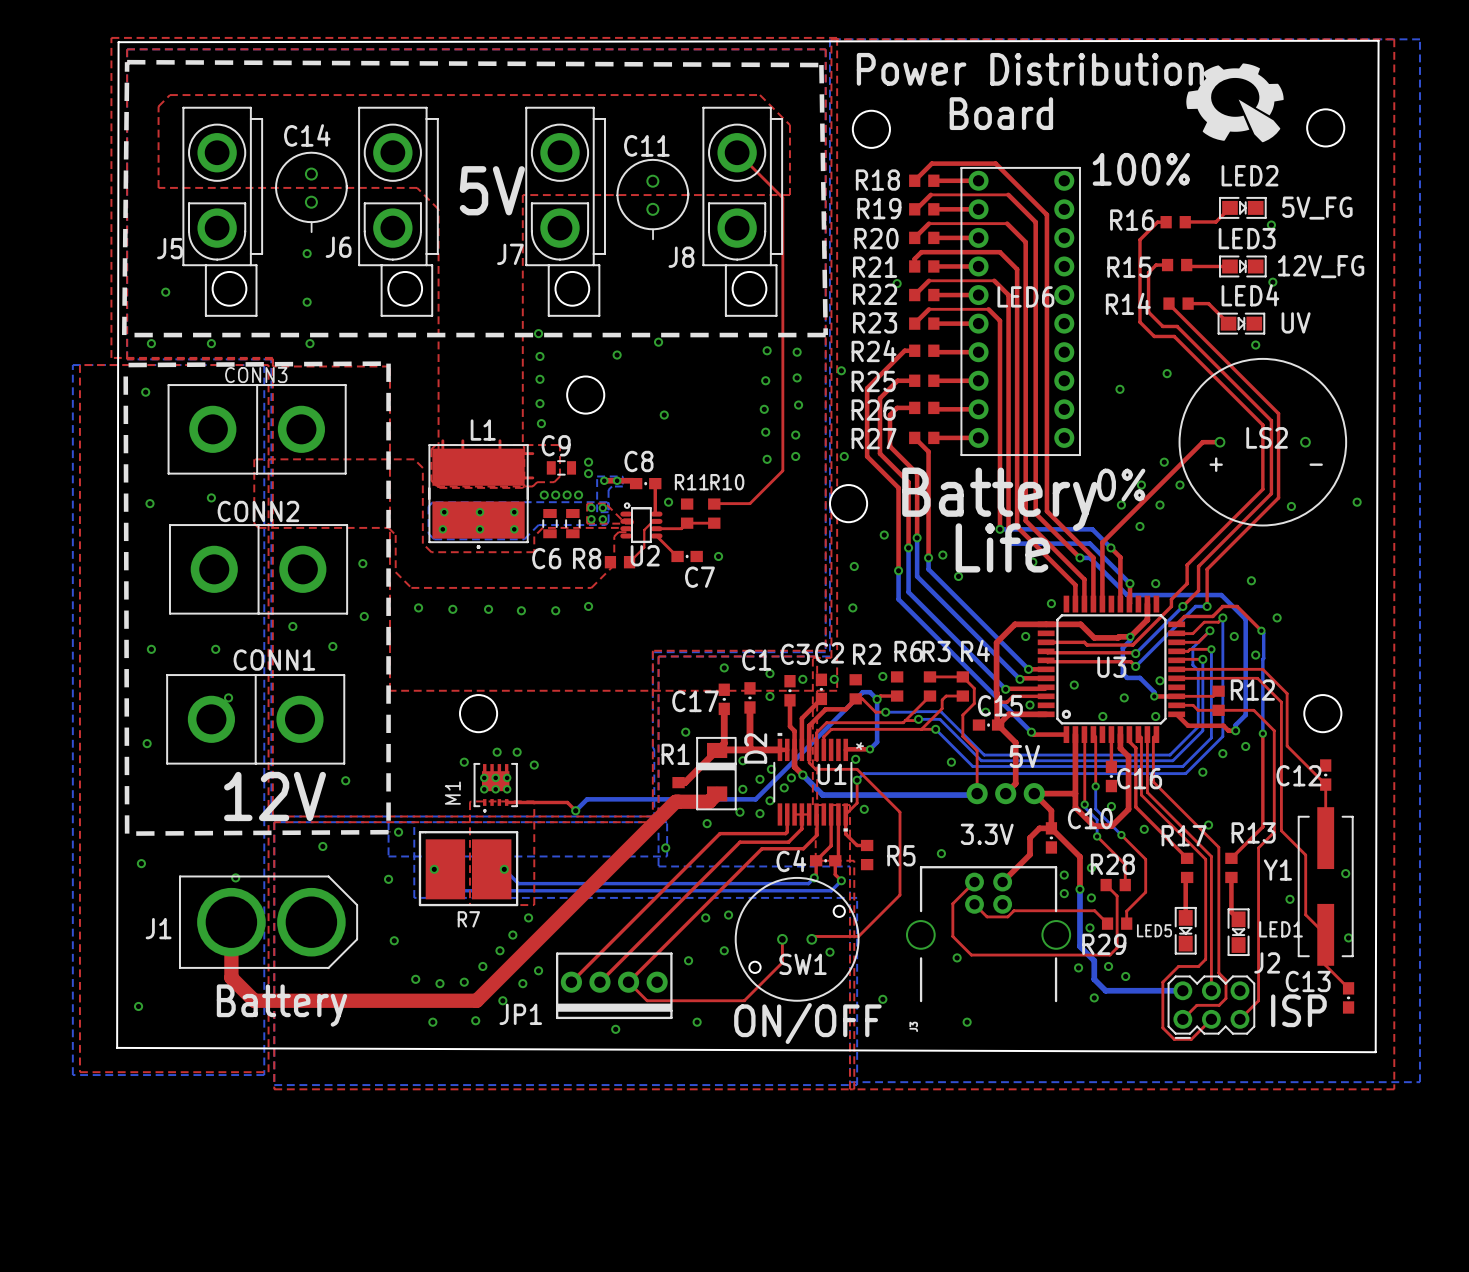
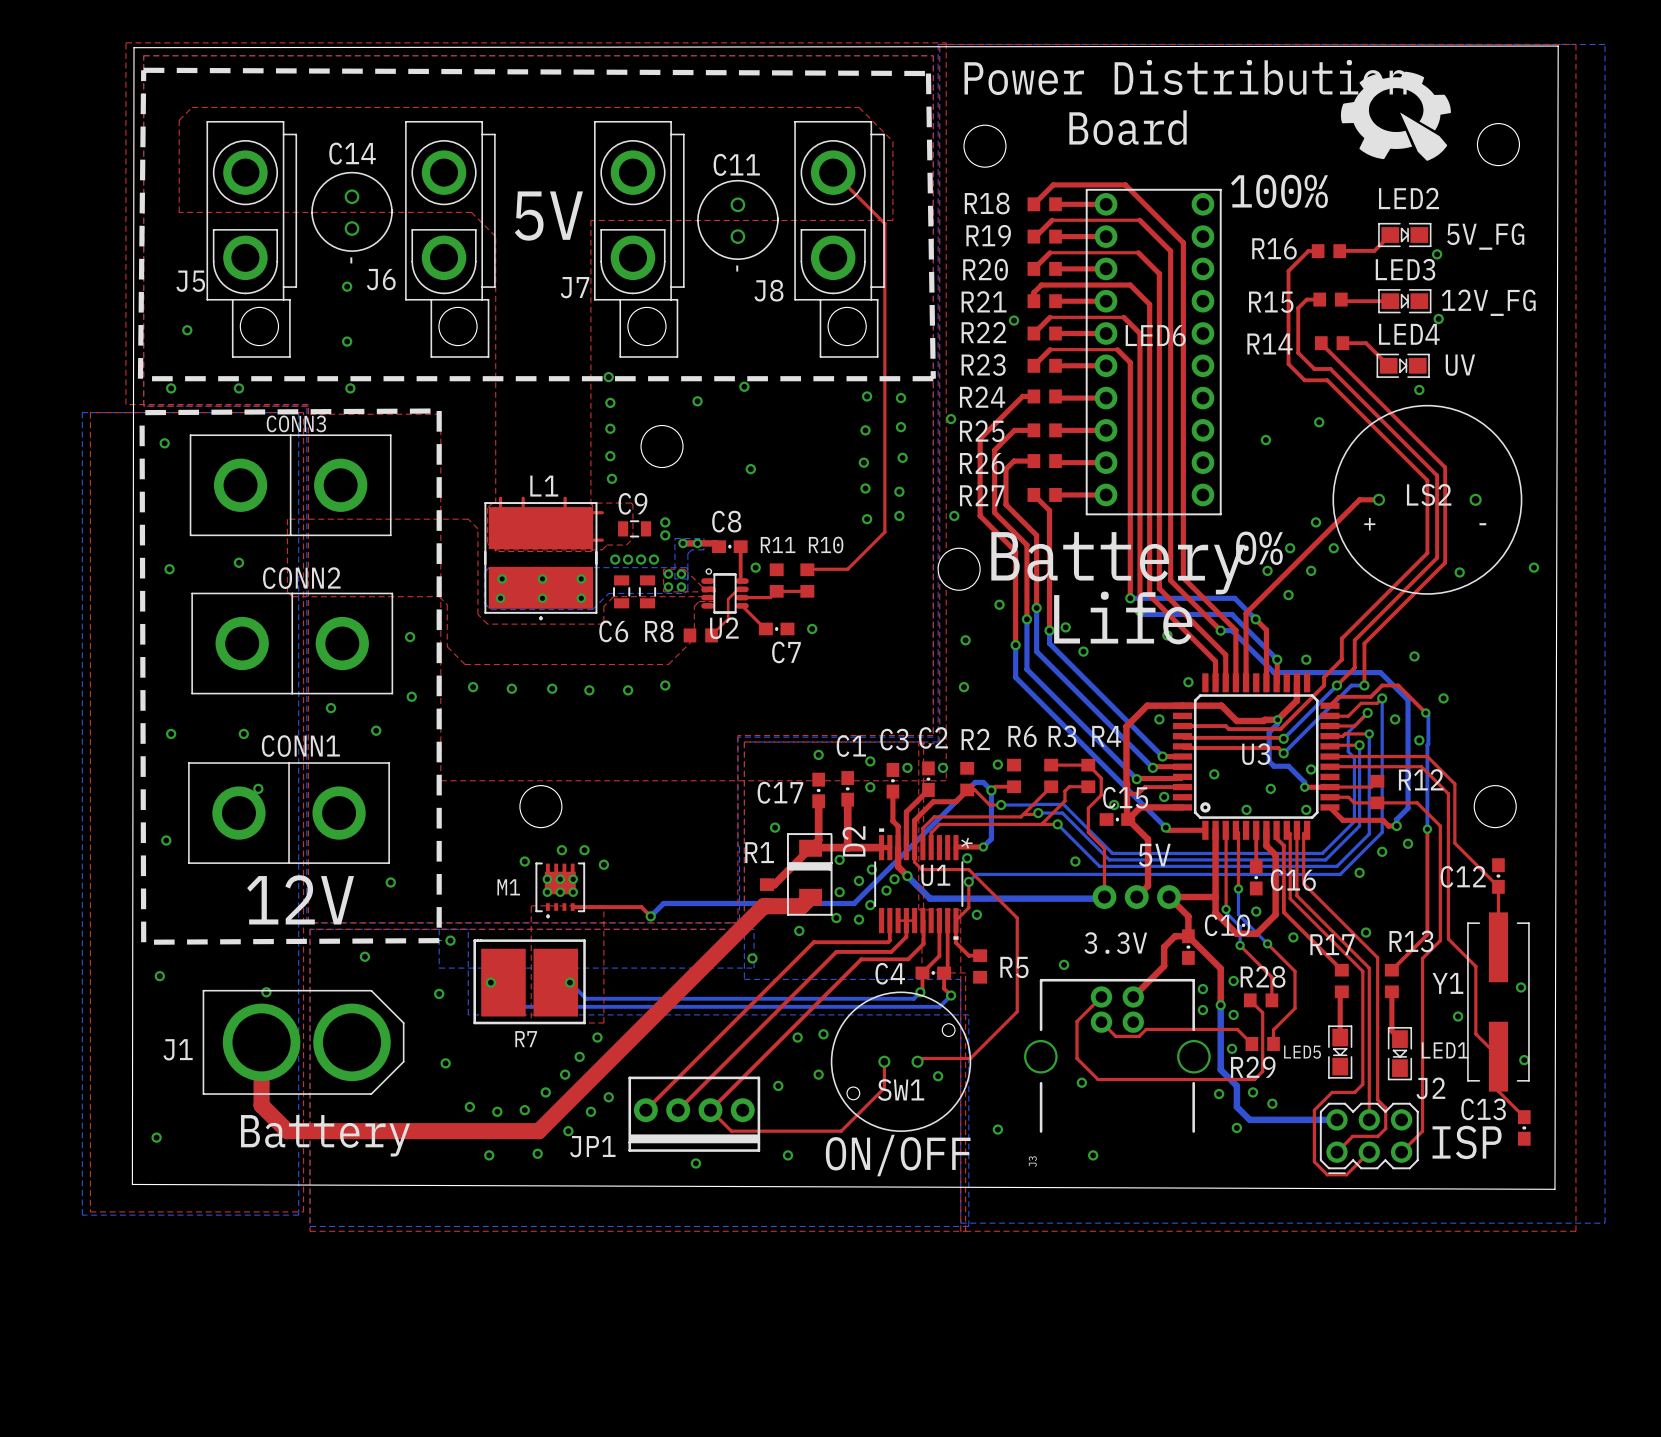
M1 name rotation: 0° (452, 793) -> 90° clockwise (508, 887)

